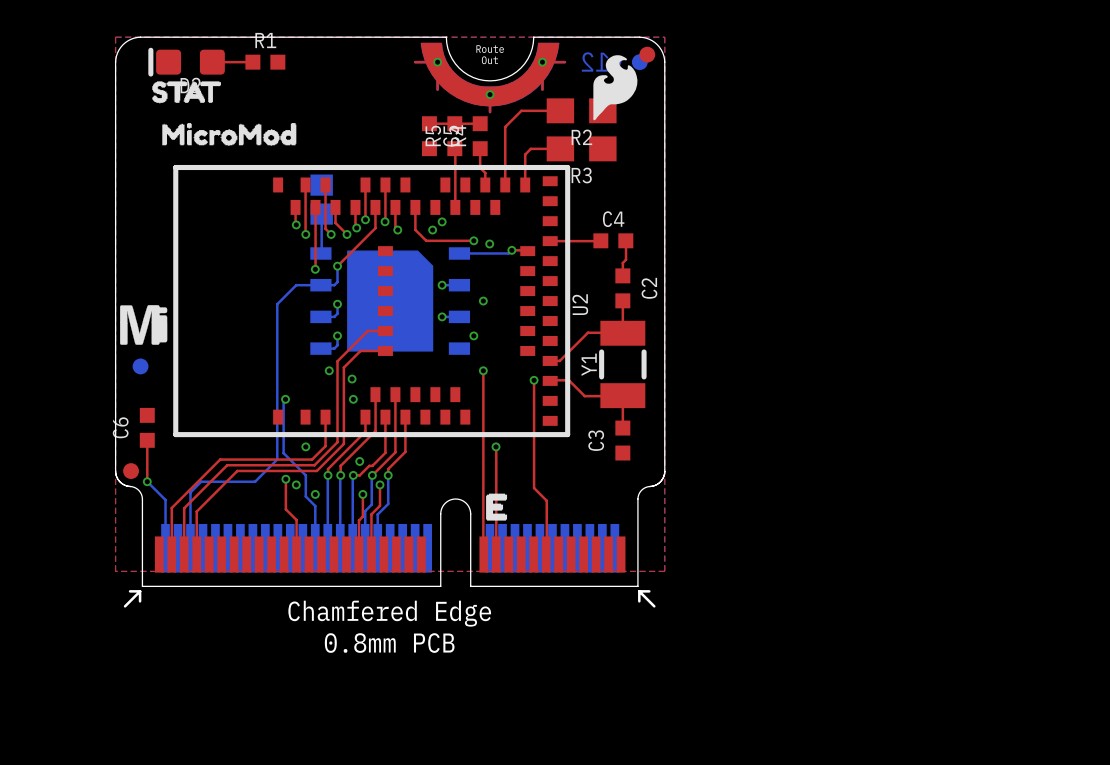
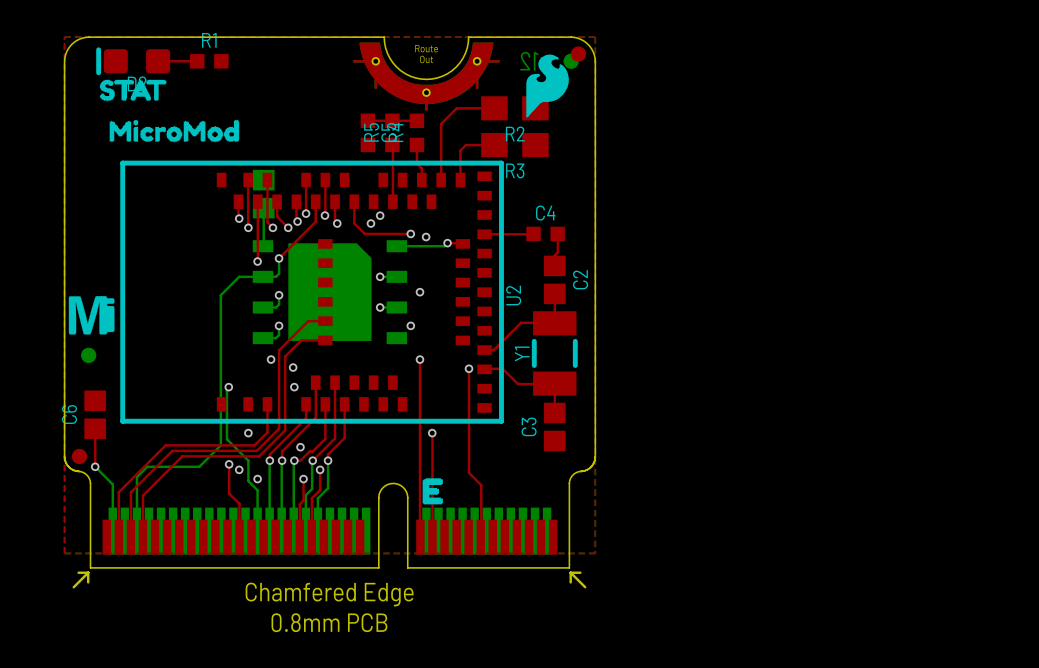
C2 footprint: [615, 268, 631, 309] -> [543, 255, 566, 305]
C6 footprint: [139, 407, 155, 448] -> [84, 390, 107, 439]
C3 footprint: [615, 420, 631, 461] -> [543, 402, 566, 452]

